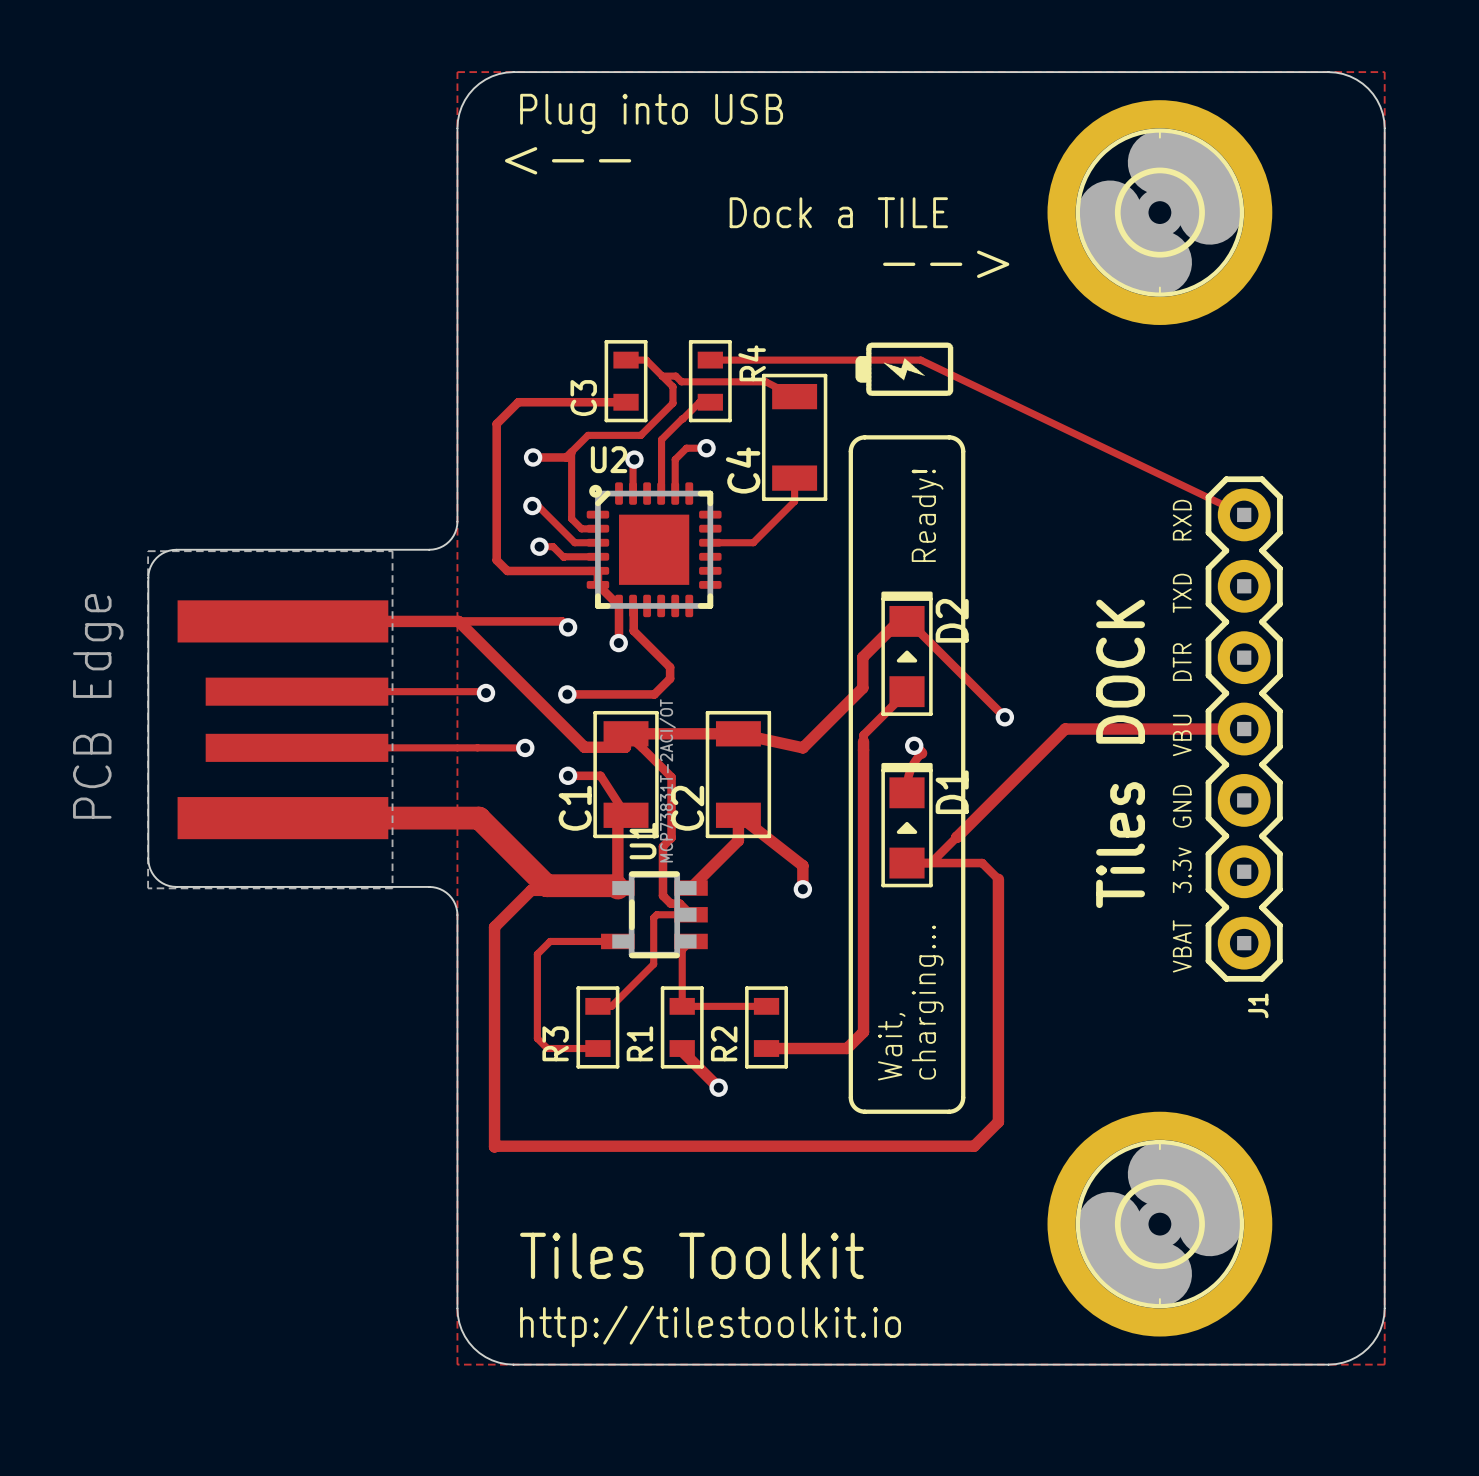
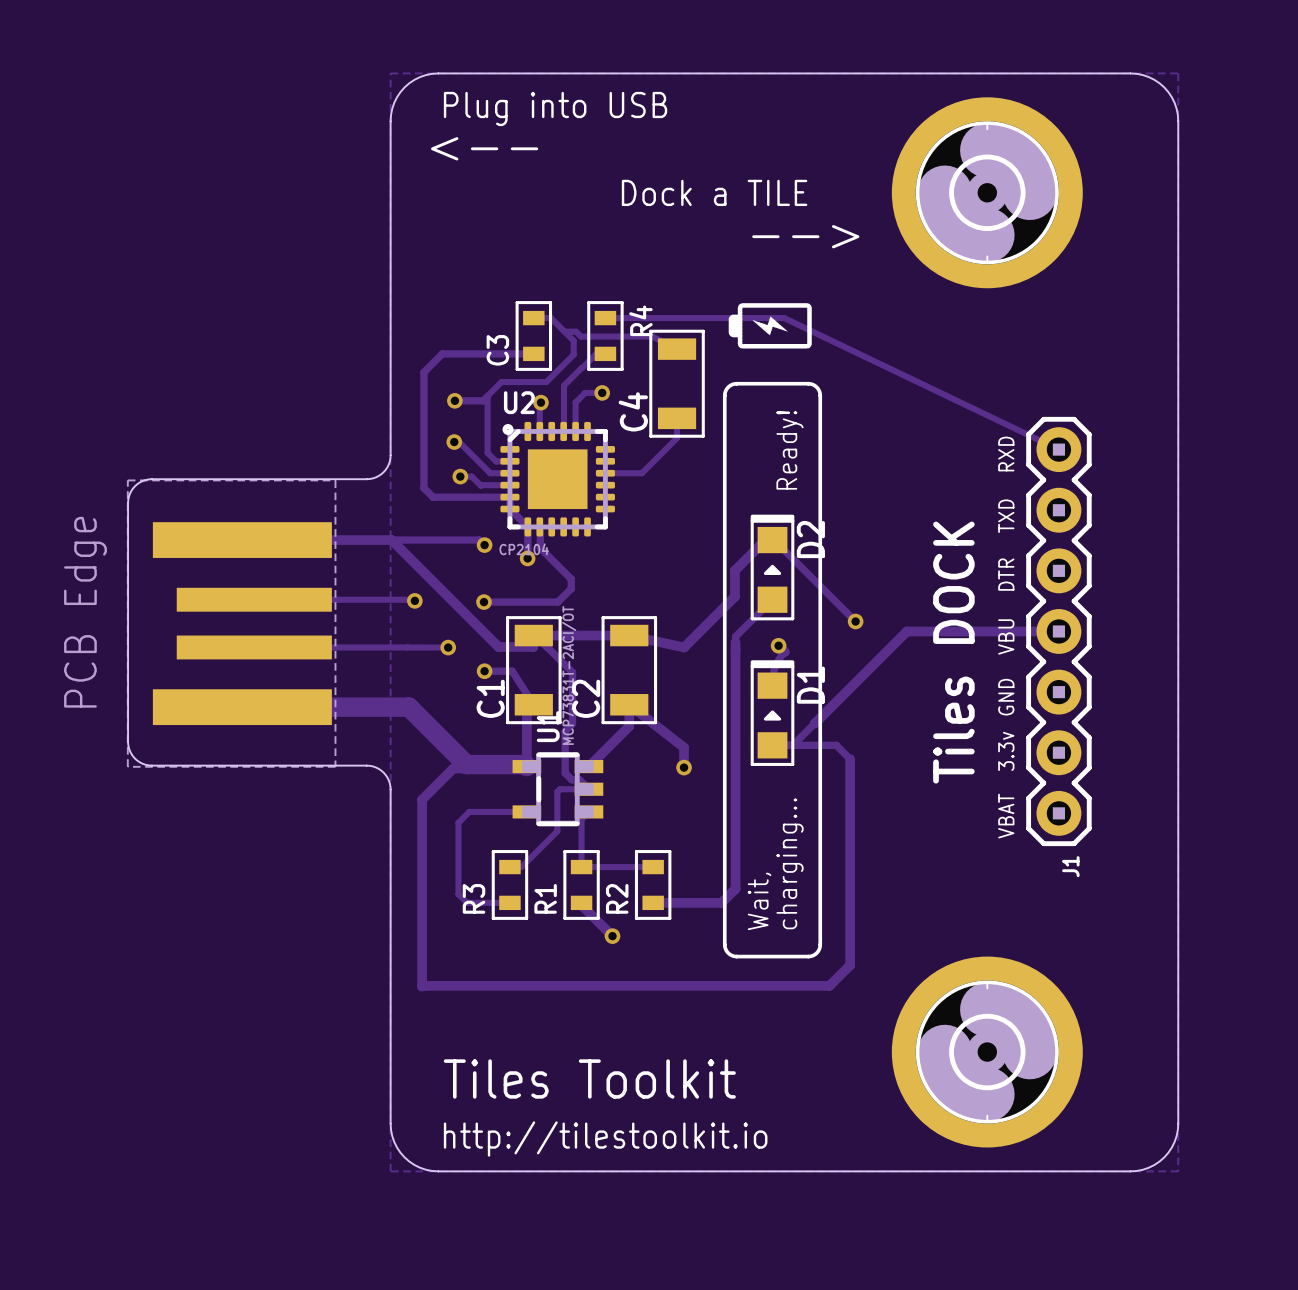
U2 value: none -> CP2104 (524, 549)

